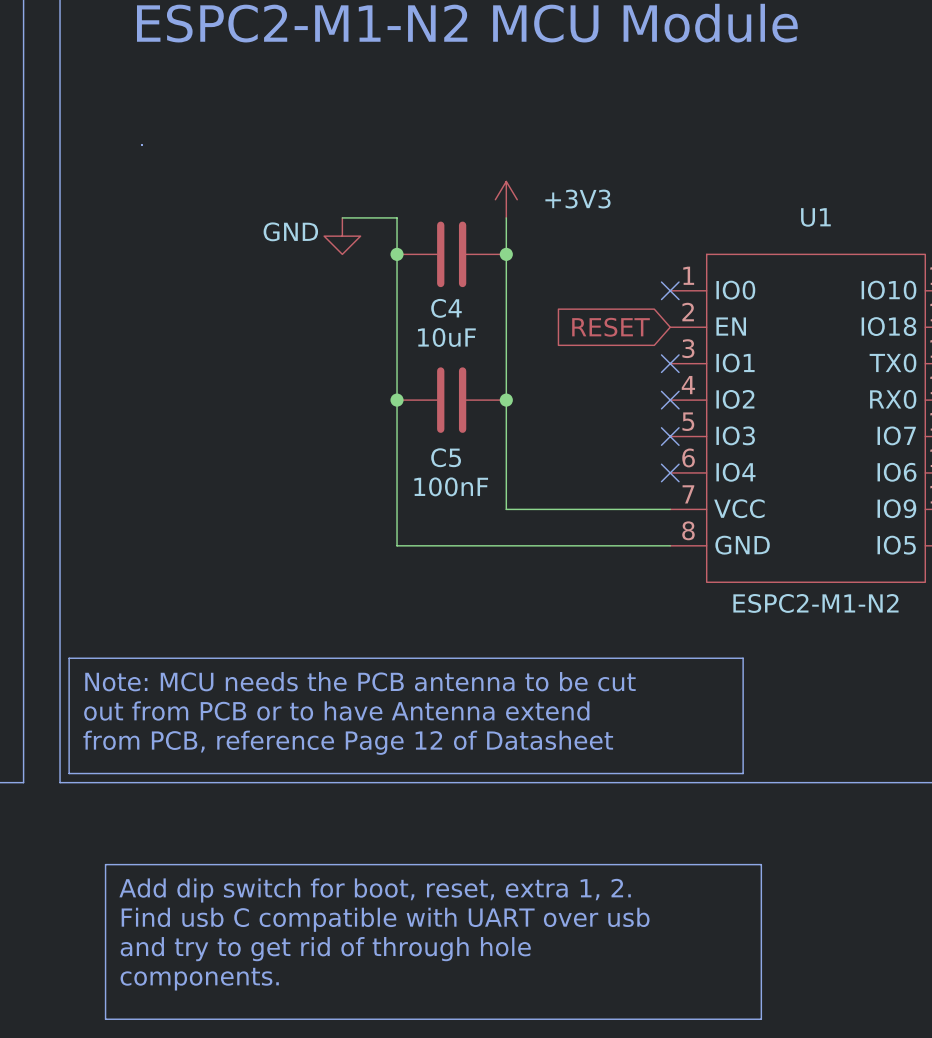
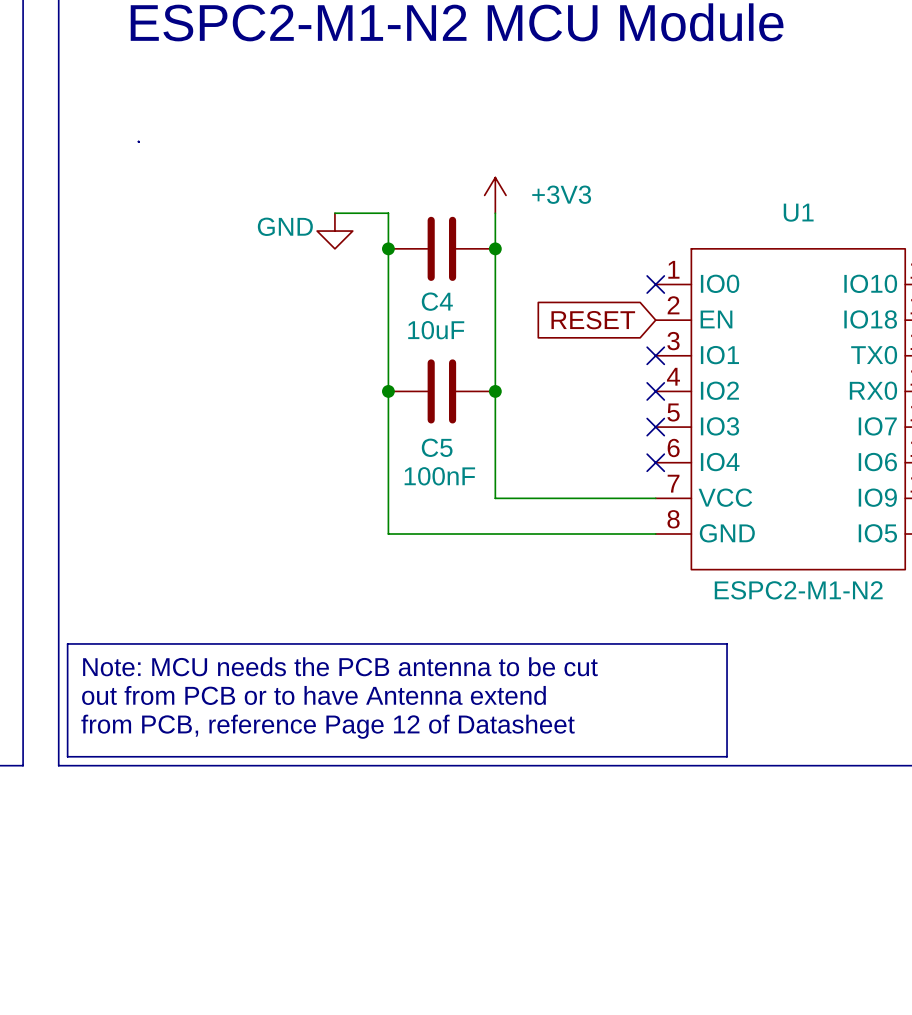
line: (105, 864) (761, 864) (761, 1019) (105, 1019) (105, 864) -> none
text: Add dip switch for boot, reset, extra 1, 2. (375, 890) -> none
text: Find usb C compatible with UART over usb (385, 919) -> none
text: and try to get rid of through hole (325, 949) -> none
text: components. (199, 979) -> none

